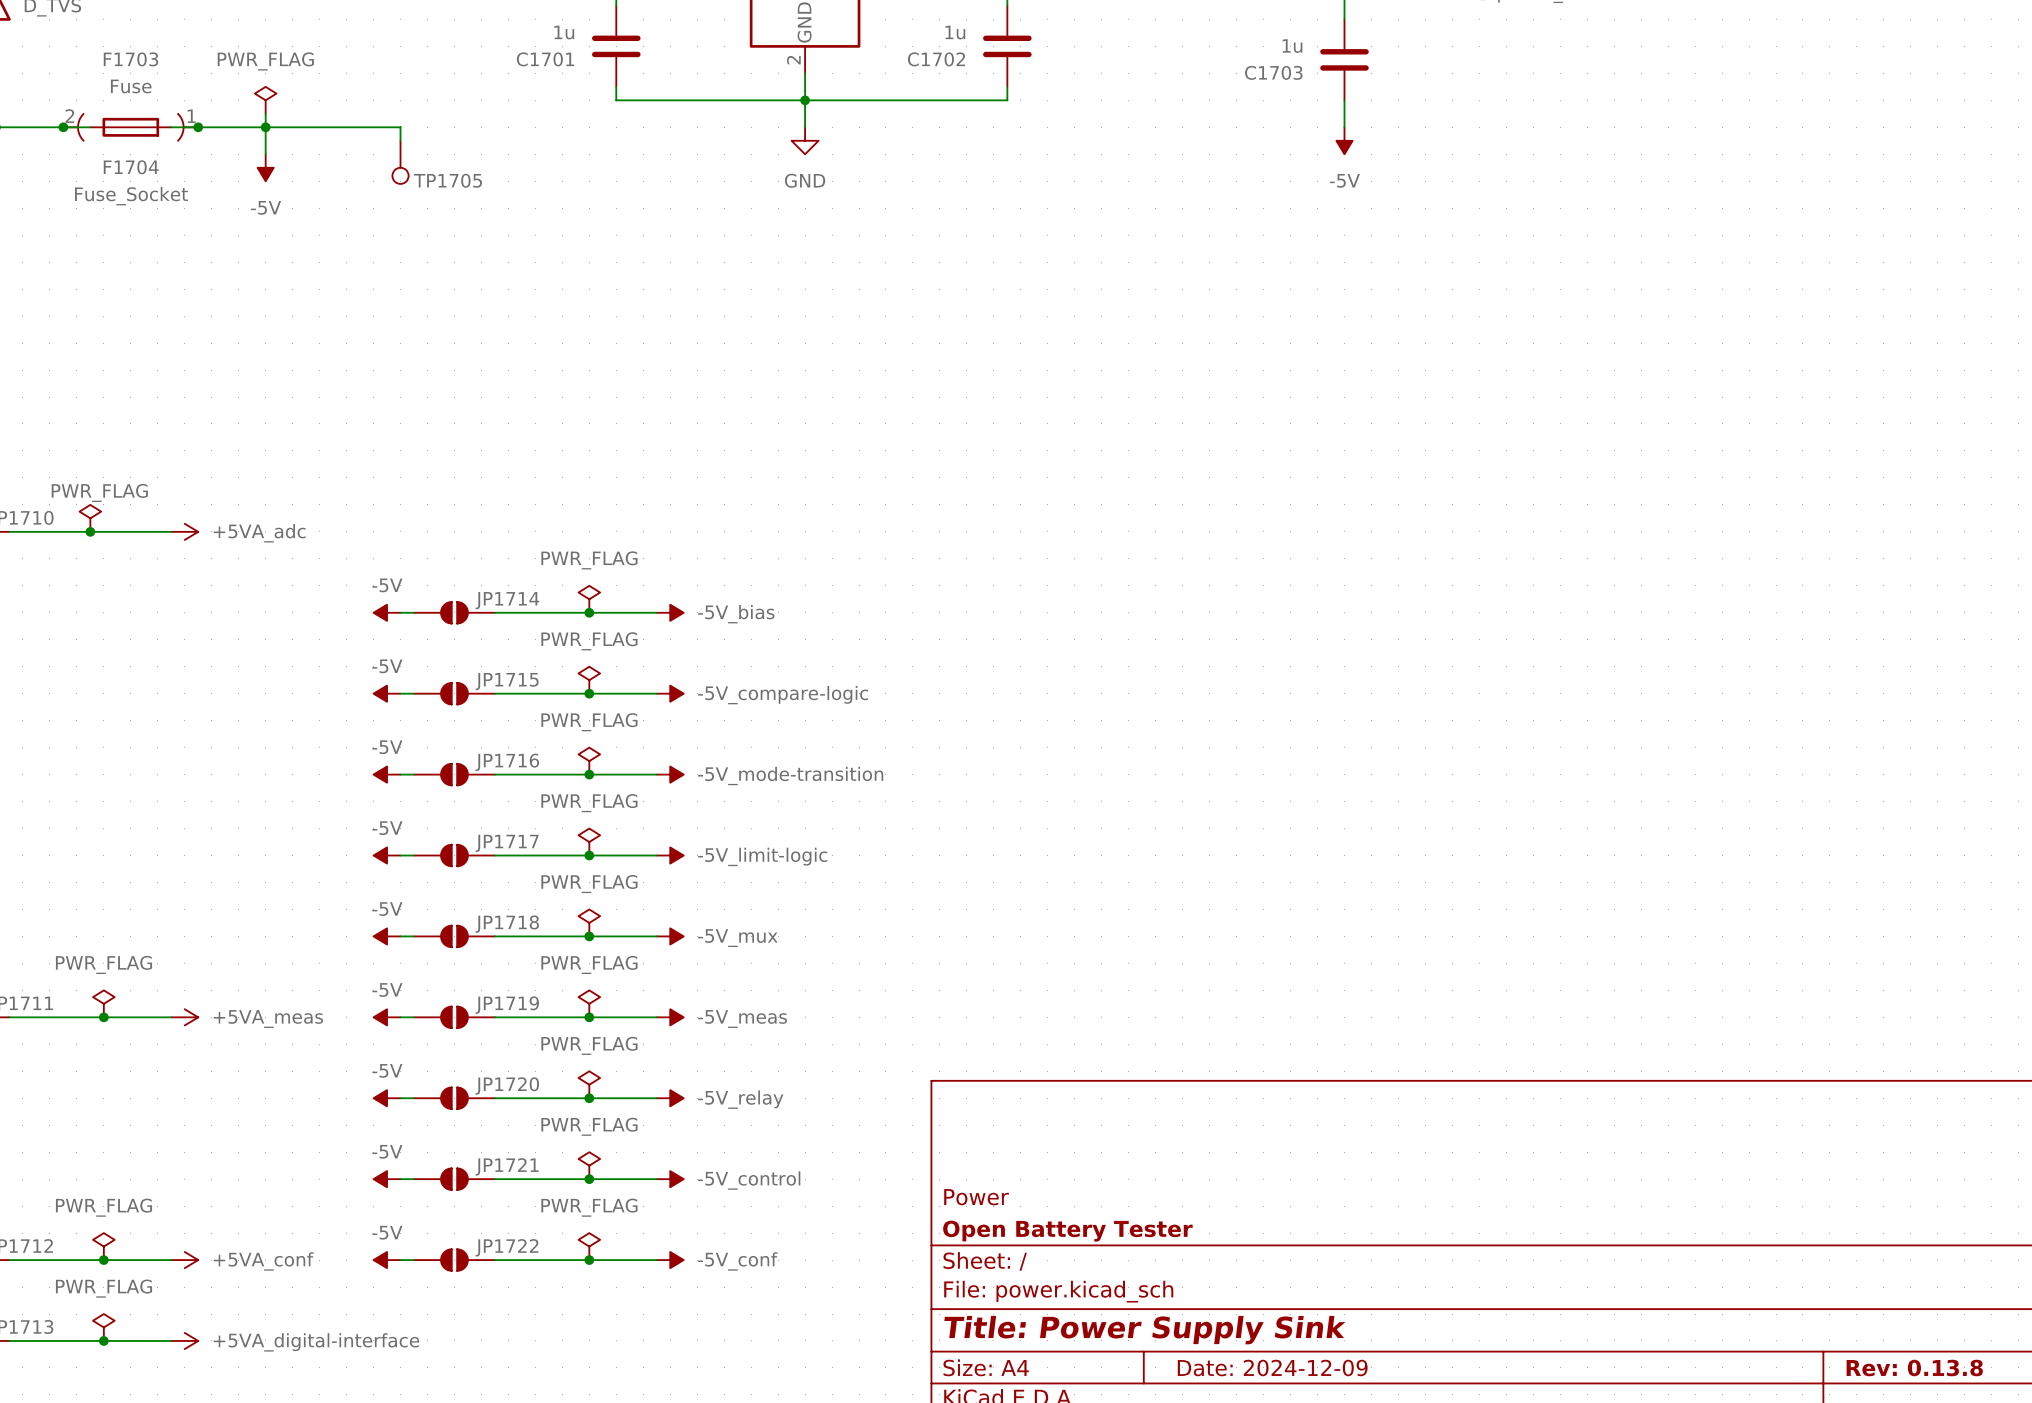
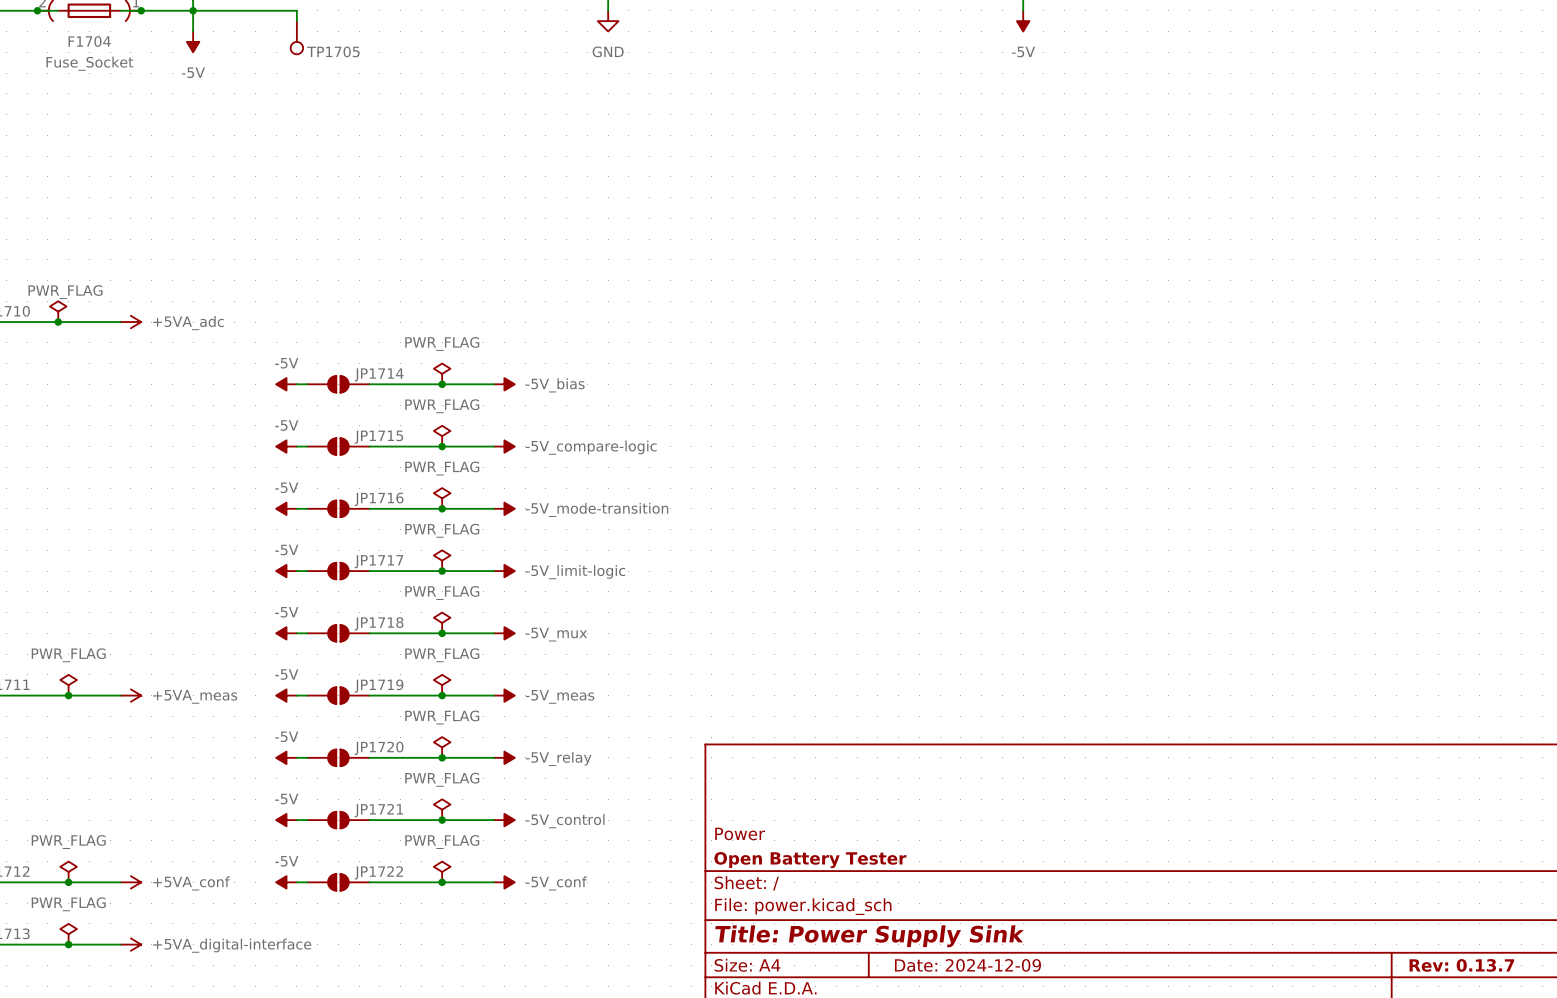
title block: Rev: 0.13.8 (1914, 1368) -> Rev: 0.13.7 (1461, 965)

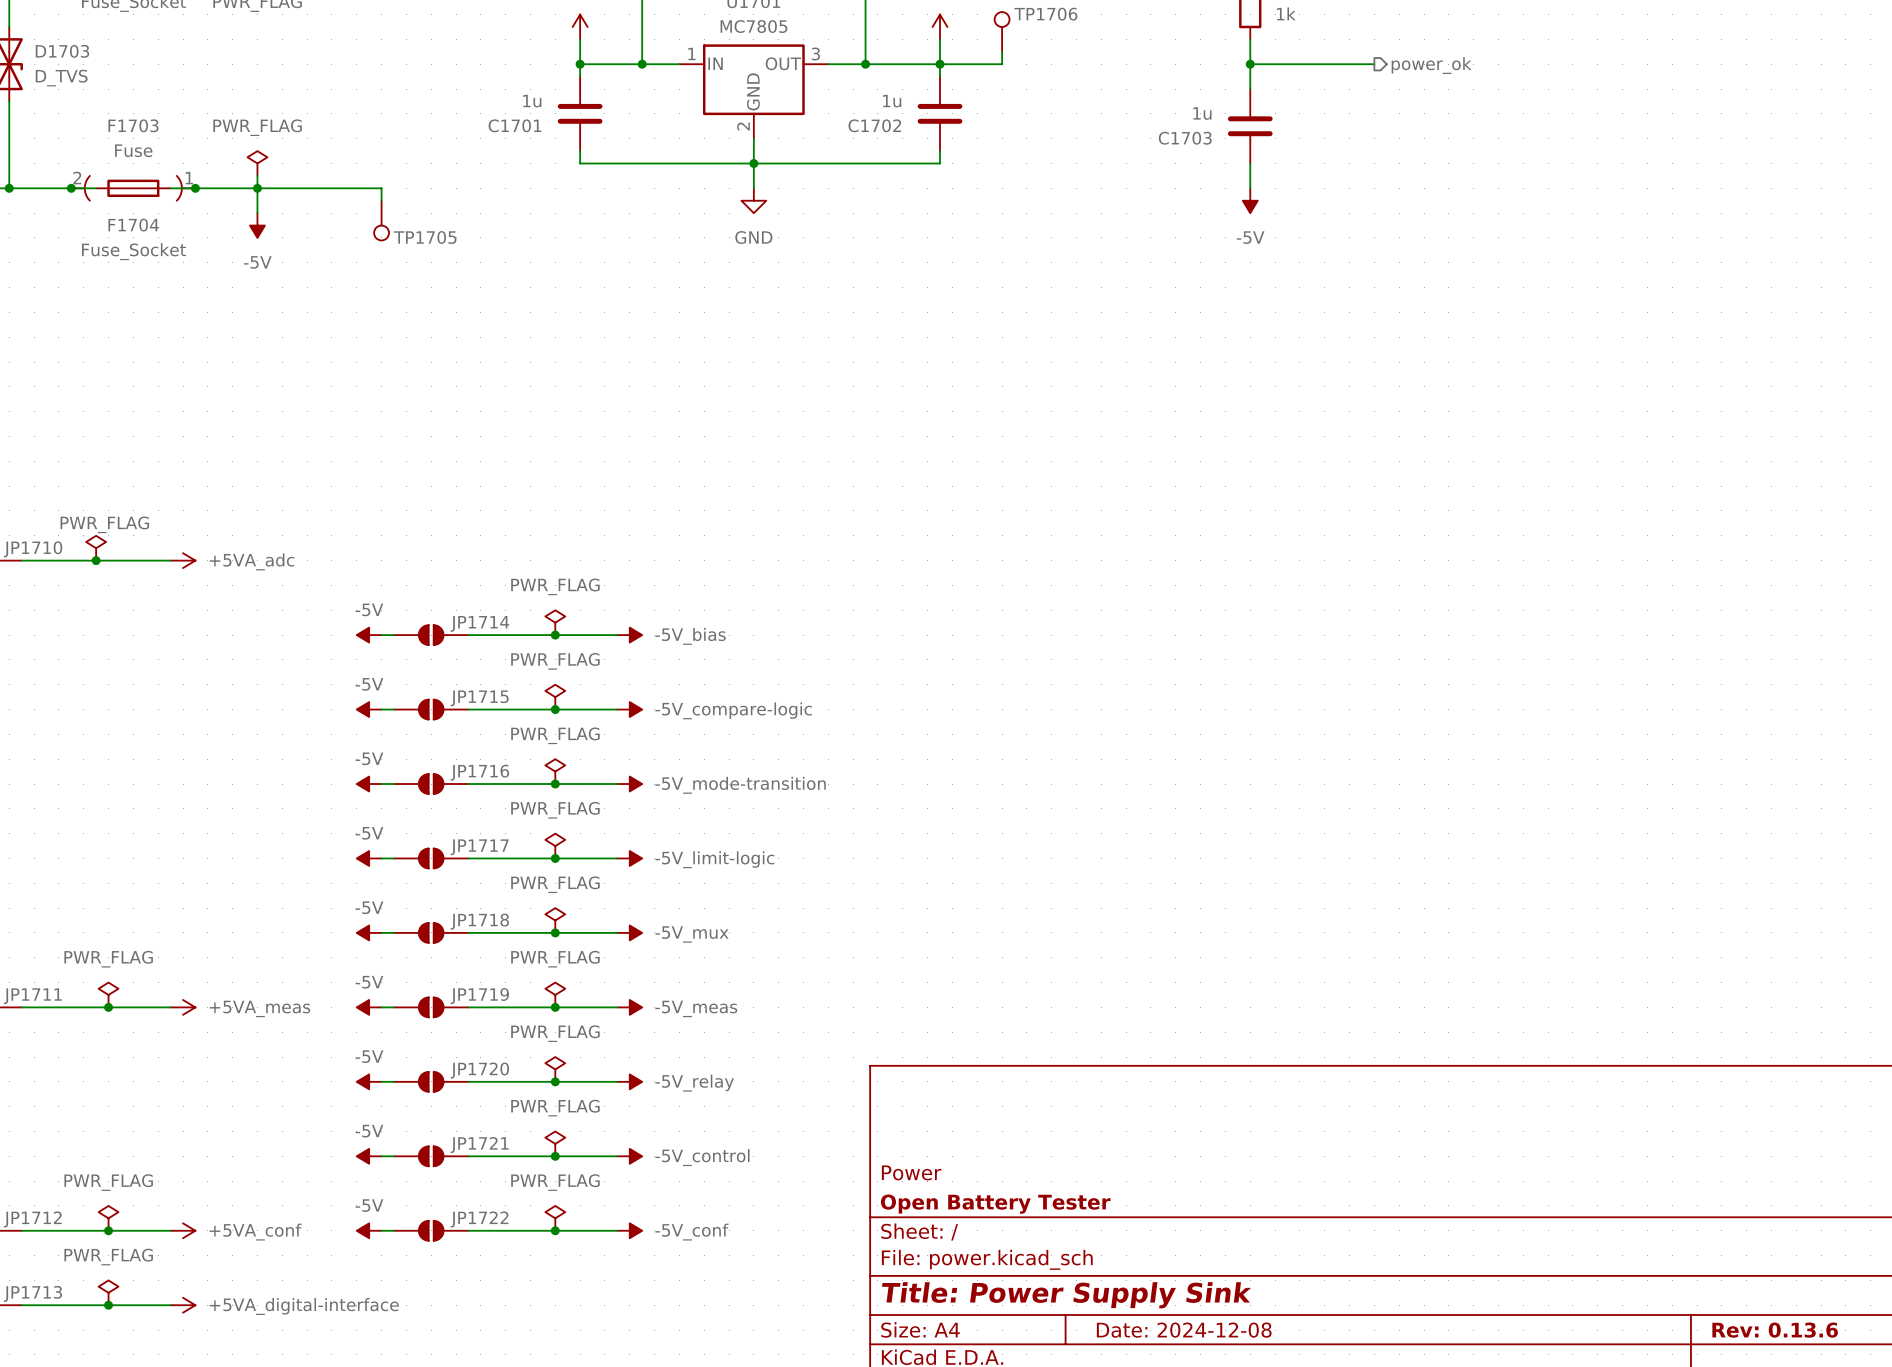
title block: Date: 2024-12-09 (967, 965) -> Date: 2024-12-08 (1184, 1330)
title block: Rev: 0.13.7 (1461, 965) -> Rev: 0.13.6 (1775, 1330)

